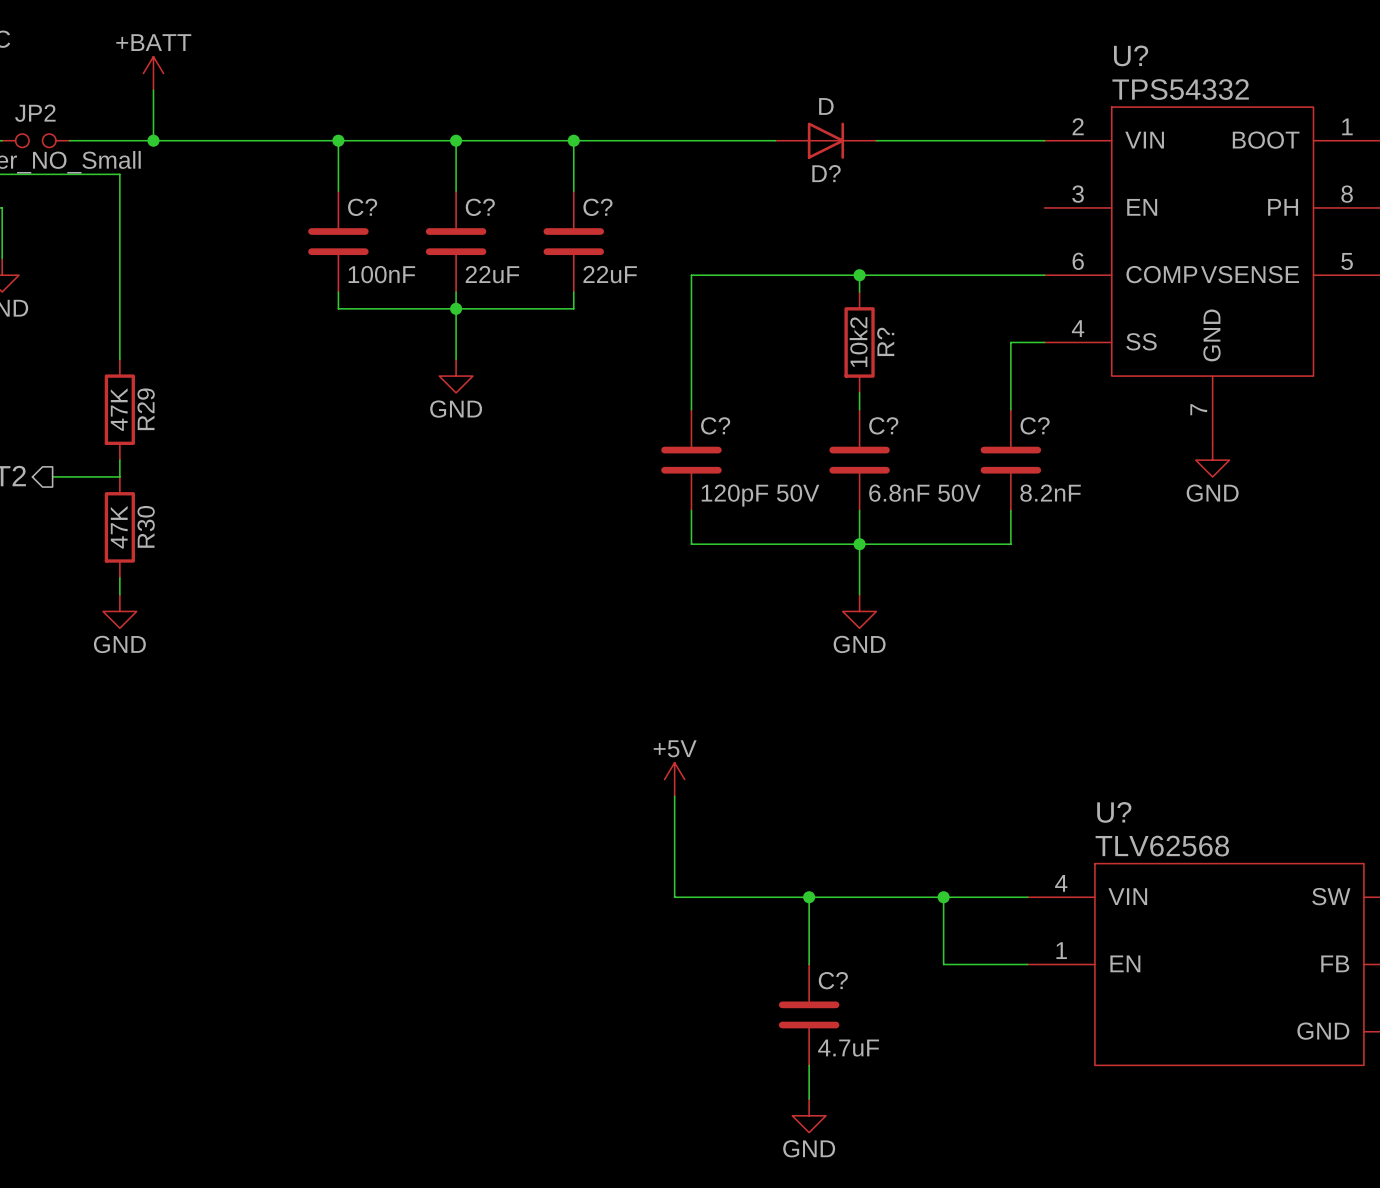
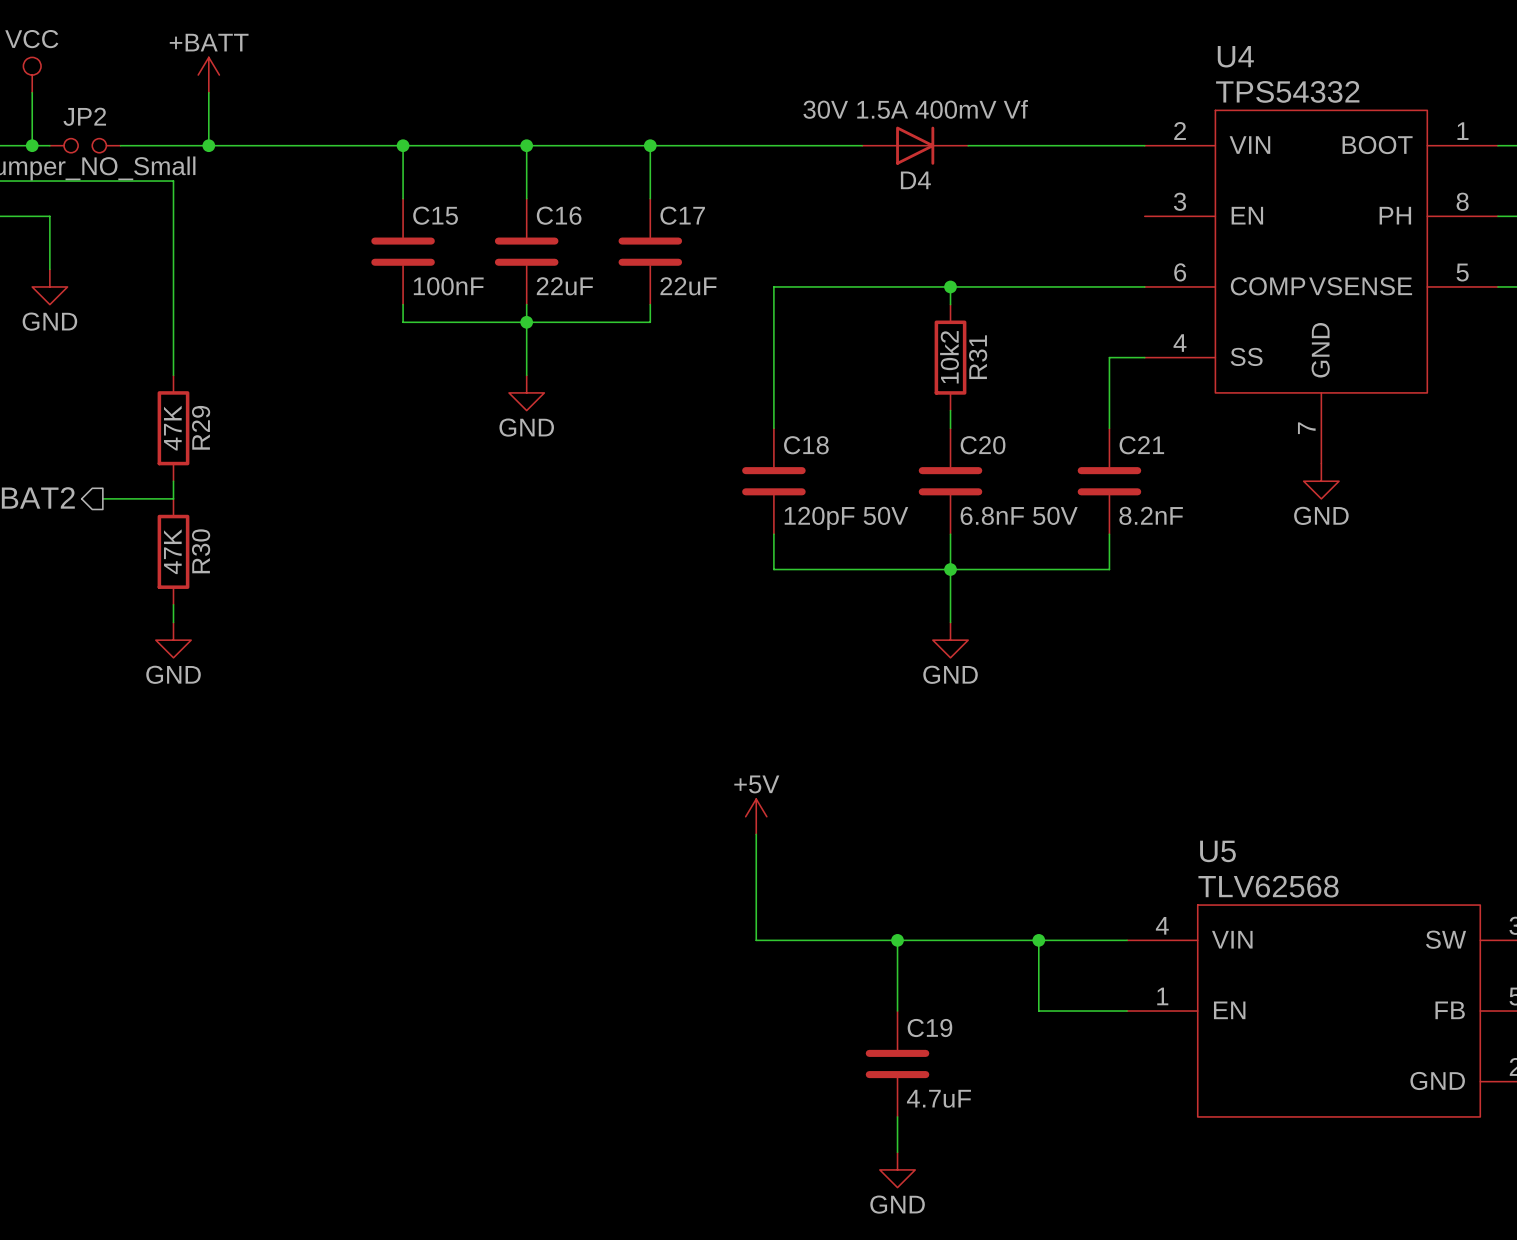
U? name: U? (1131, 55) -> U4 (1235, 56)
D? value: D (826, 106) -> 30V 1.5A 400mV Vf (915, 109)
D? name: D? (826, 173) -> D4 (915, 180)
C? name: C? (362, 207) -> C15 (435, 215)
C? name: C? (480, 207) -> C16 (559, 215)
C? name: C? (597, 207) -> C17 (682, 215)
R? name: R? (885, 341) -> R31 (978, 357)
C? name: C? (715, 425) -> C18 (806, 445)
C? name: C? (883, 425) -> C20 (983, 445)
C? name: C? (1035, 425) -> C21 (1141, 445)
U? name: U? (1114, 812) -> U5 (1217, 851)
C? name: C? (833, 980) -> C19 (929, 1028)

